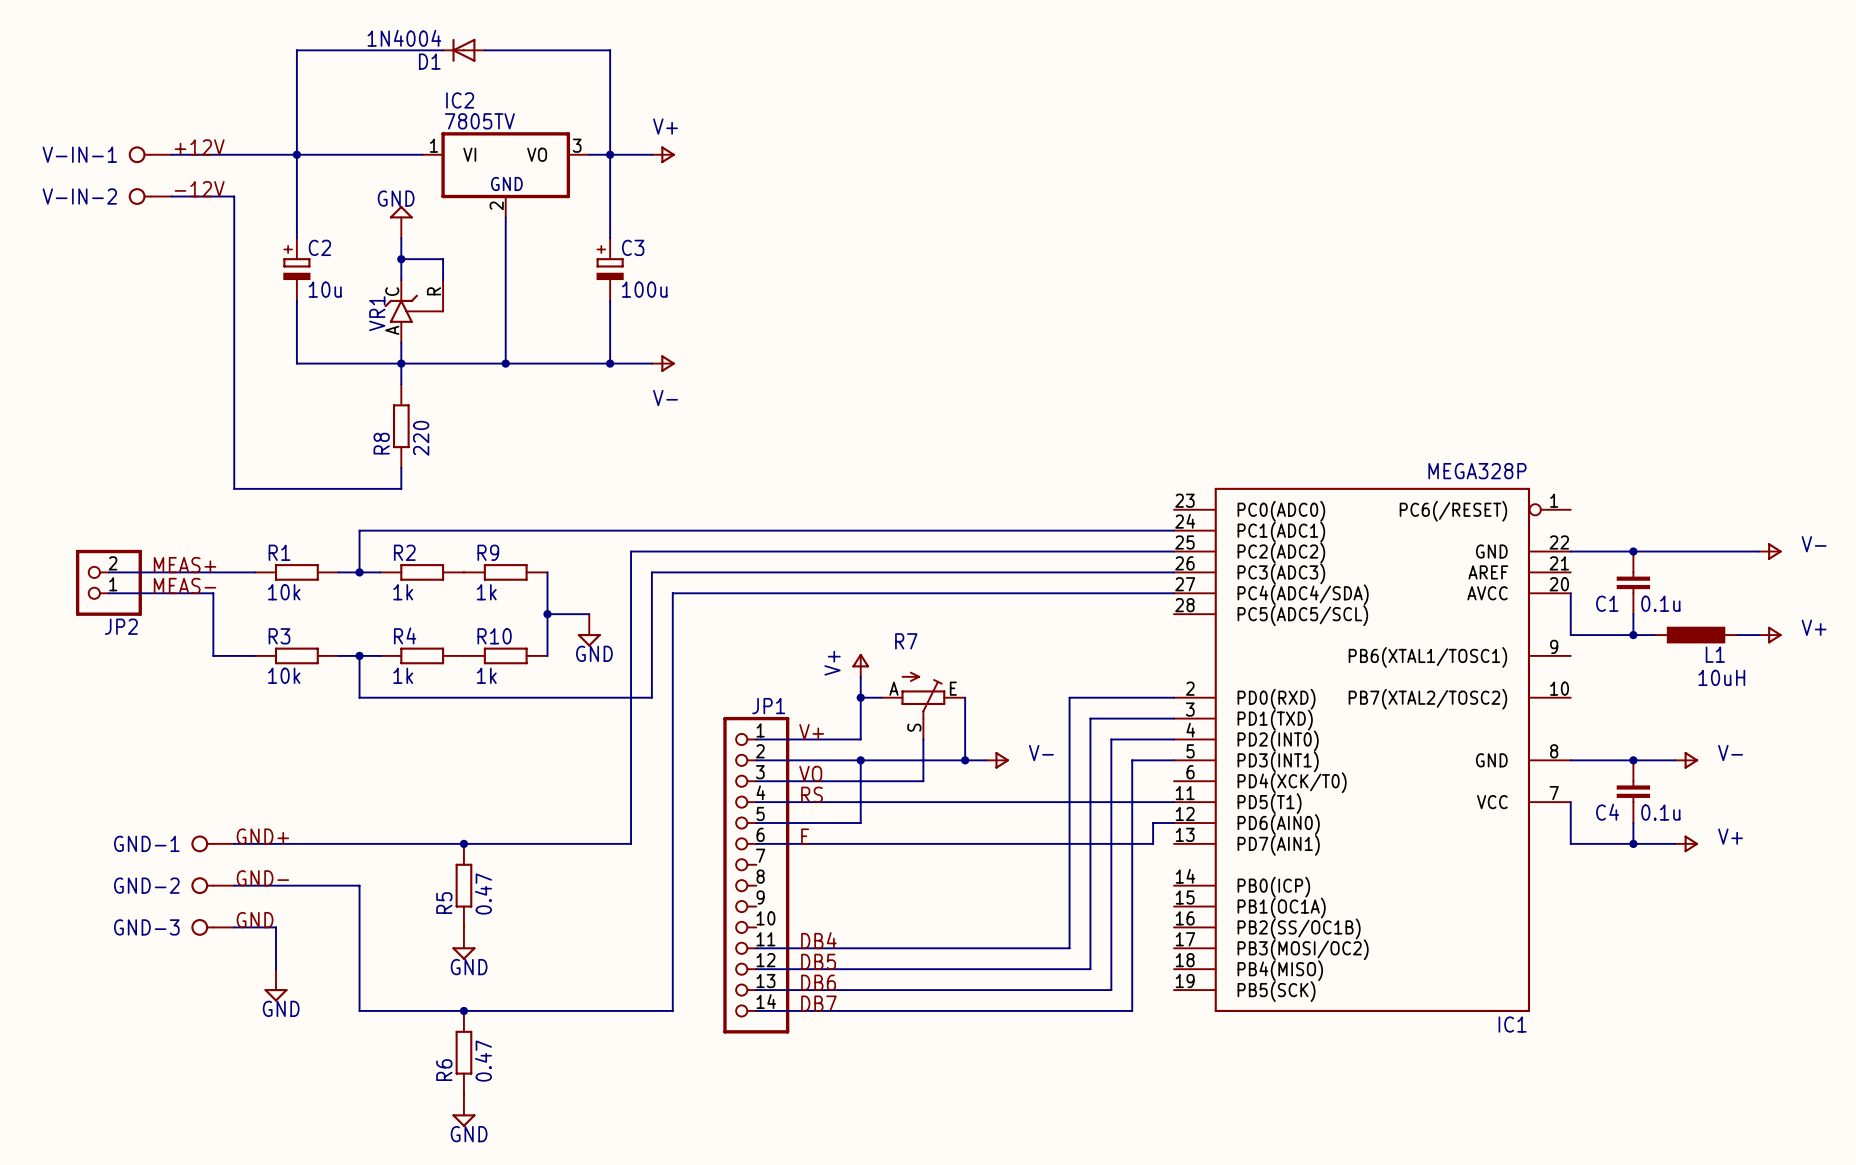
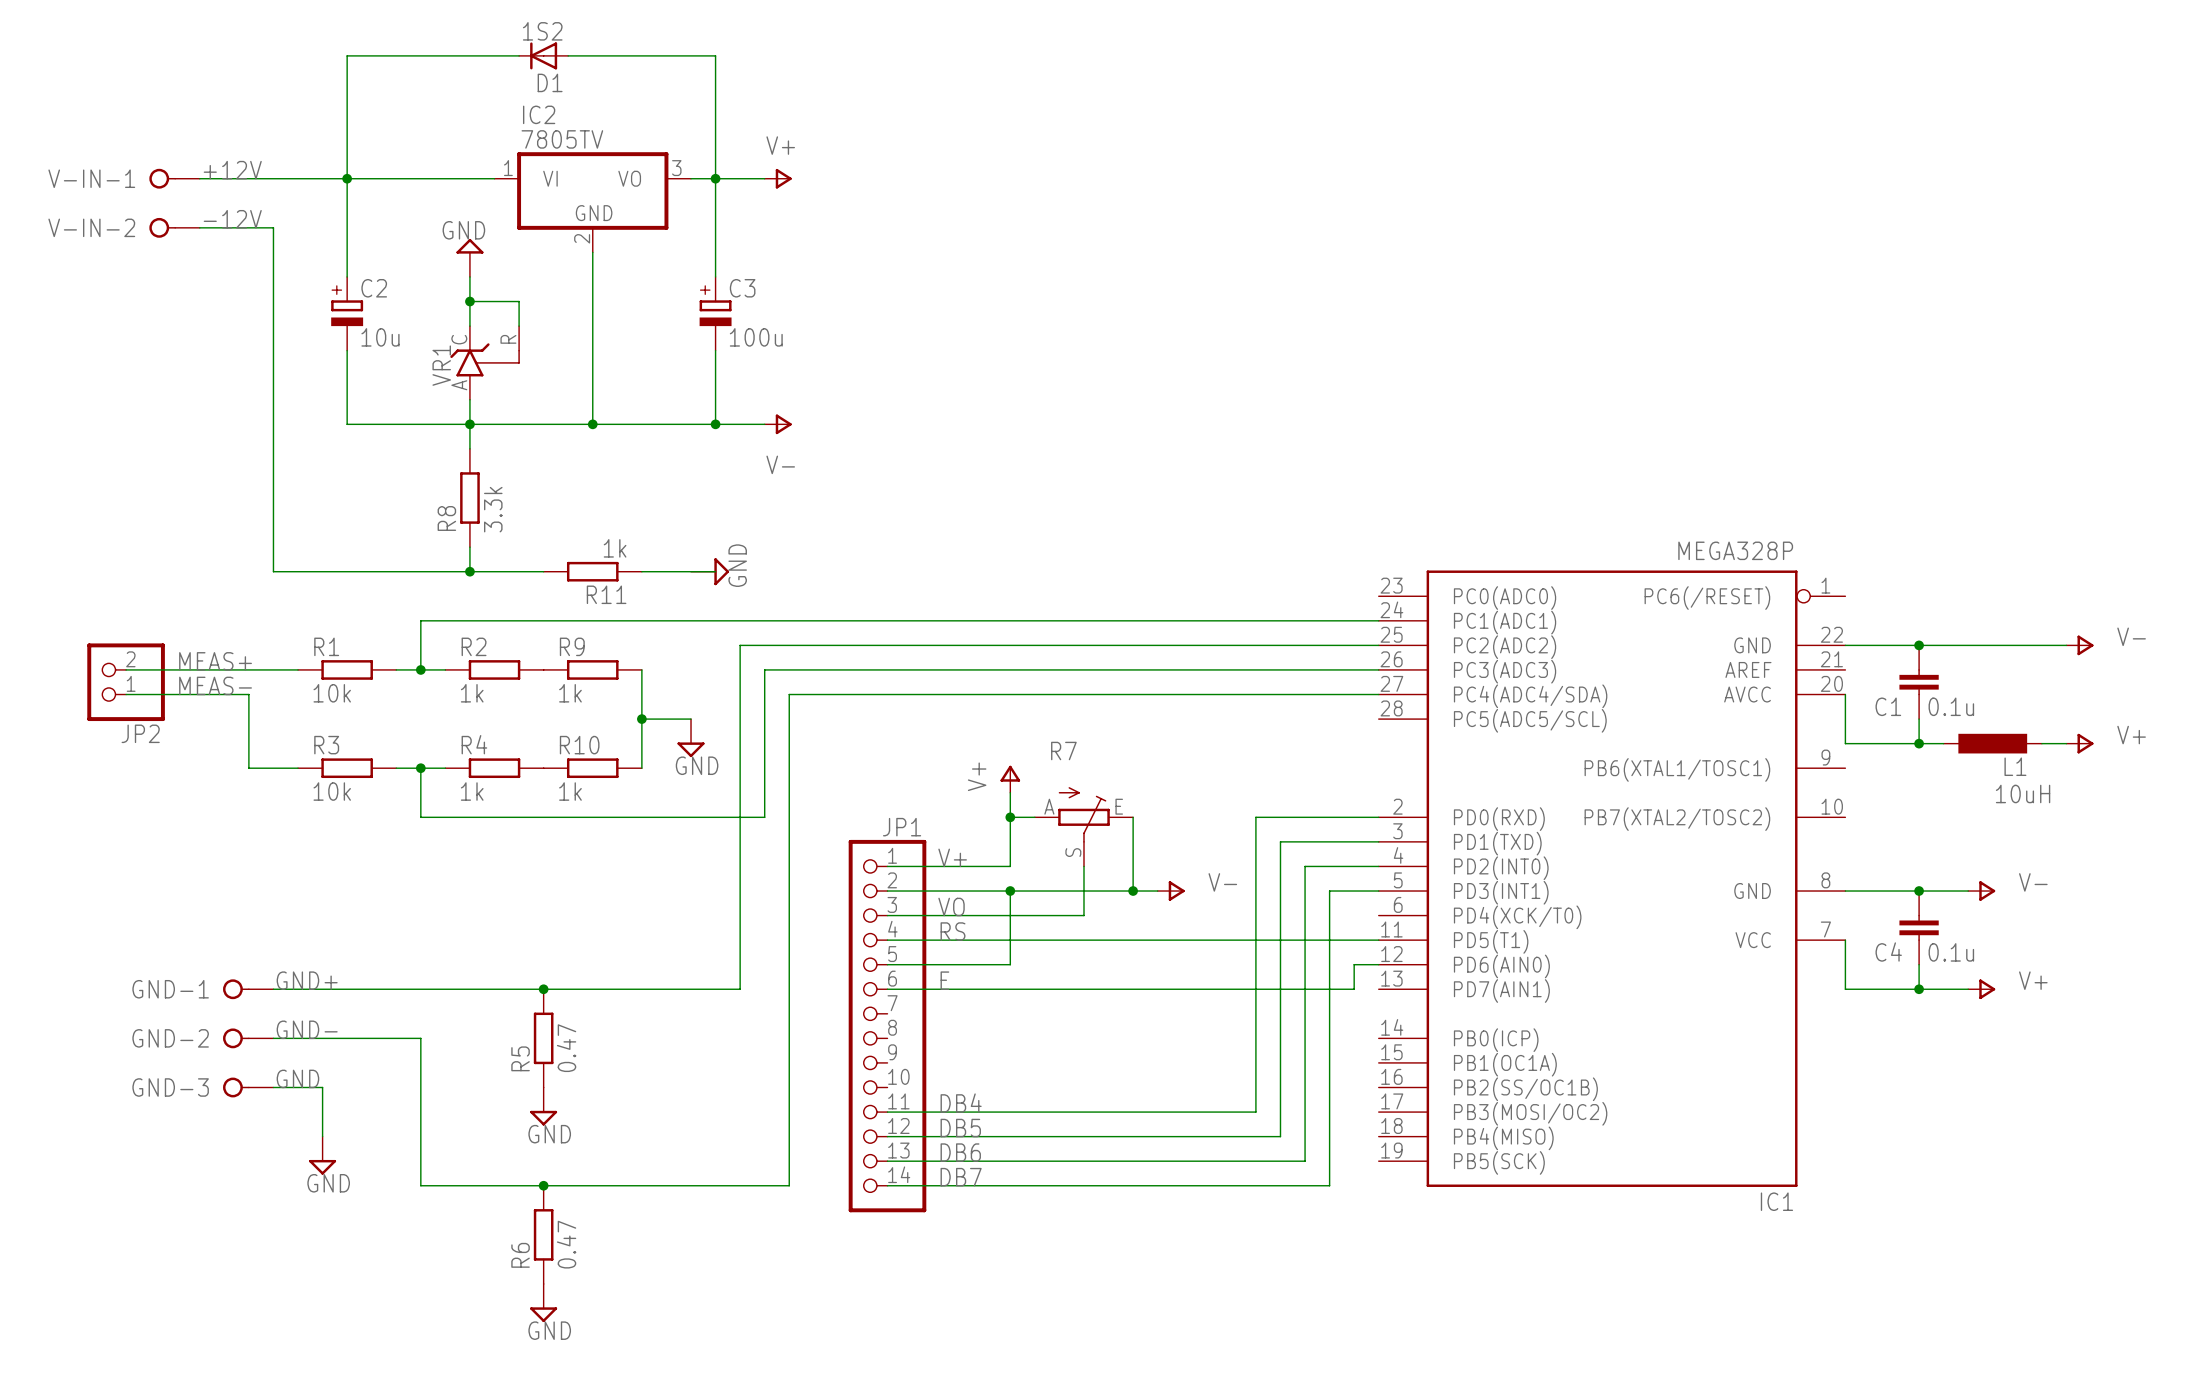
D1 value: 1N4004 (404, 38) -> 1S2 (542, 31)
D1 name position: D1 (429, 61) -> D1 (550, 82)
R8 value: 220 (421, 438) -> 3.3k (493, 509)
wire: none -> (469, 571) (543, 571)
junction: none -> (469, 571)
R11: none -> 1k (592, 571)
wire: none -> (641, 571) (715, 571)
power symbol: none -> GND (710, 571)

